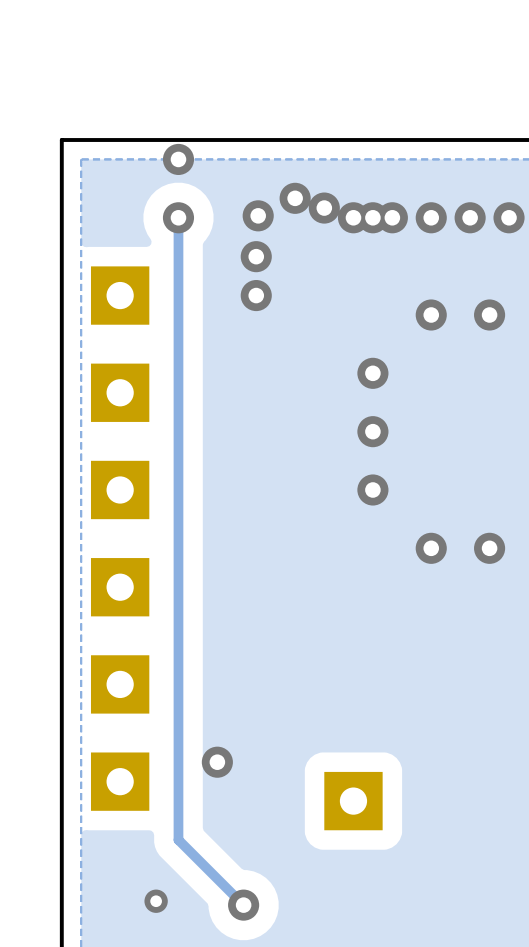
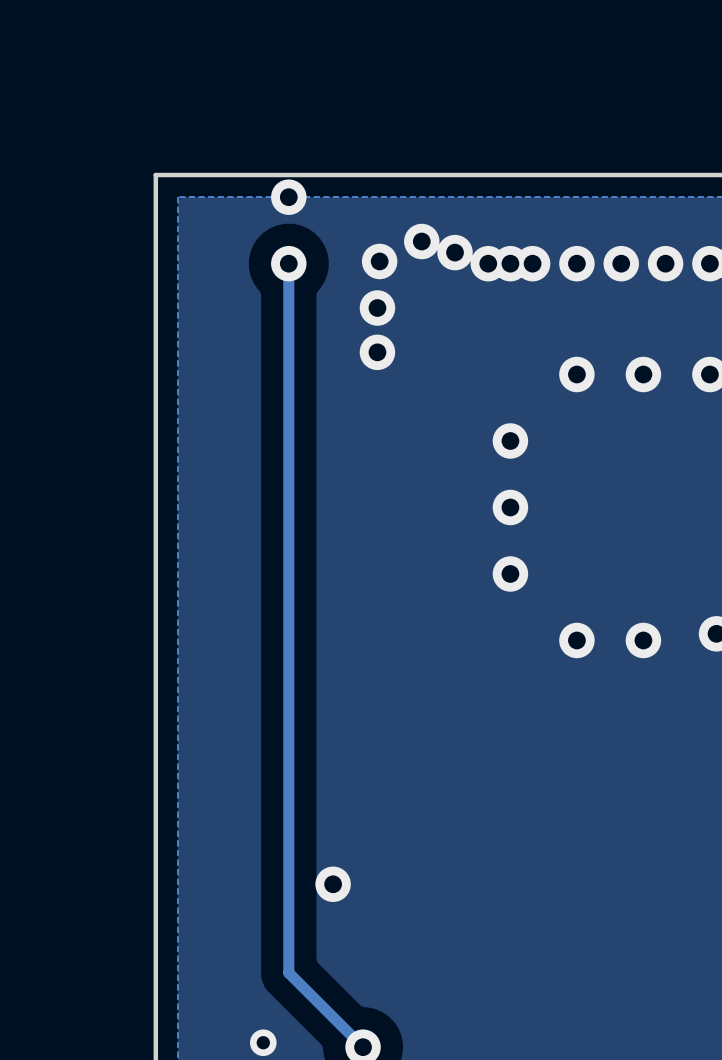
part: (120, 295) -> none
part: (120, 392) -> none
part: (120, 489) -> none
part: (120, 587) -> none
part: (120, 684) -> none
part: (120, 781) -> none
part: (353, 801) -> none

